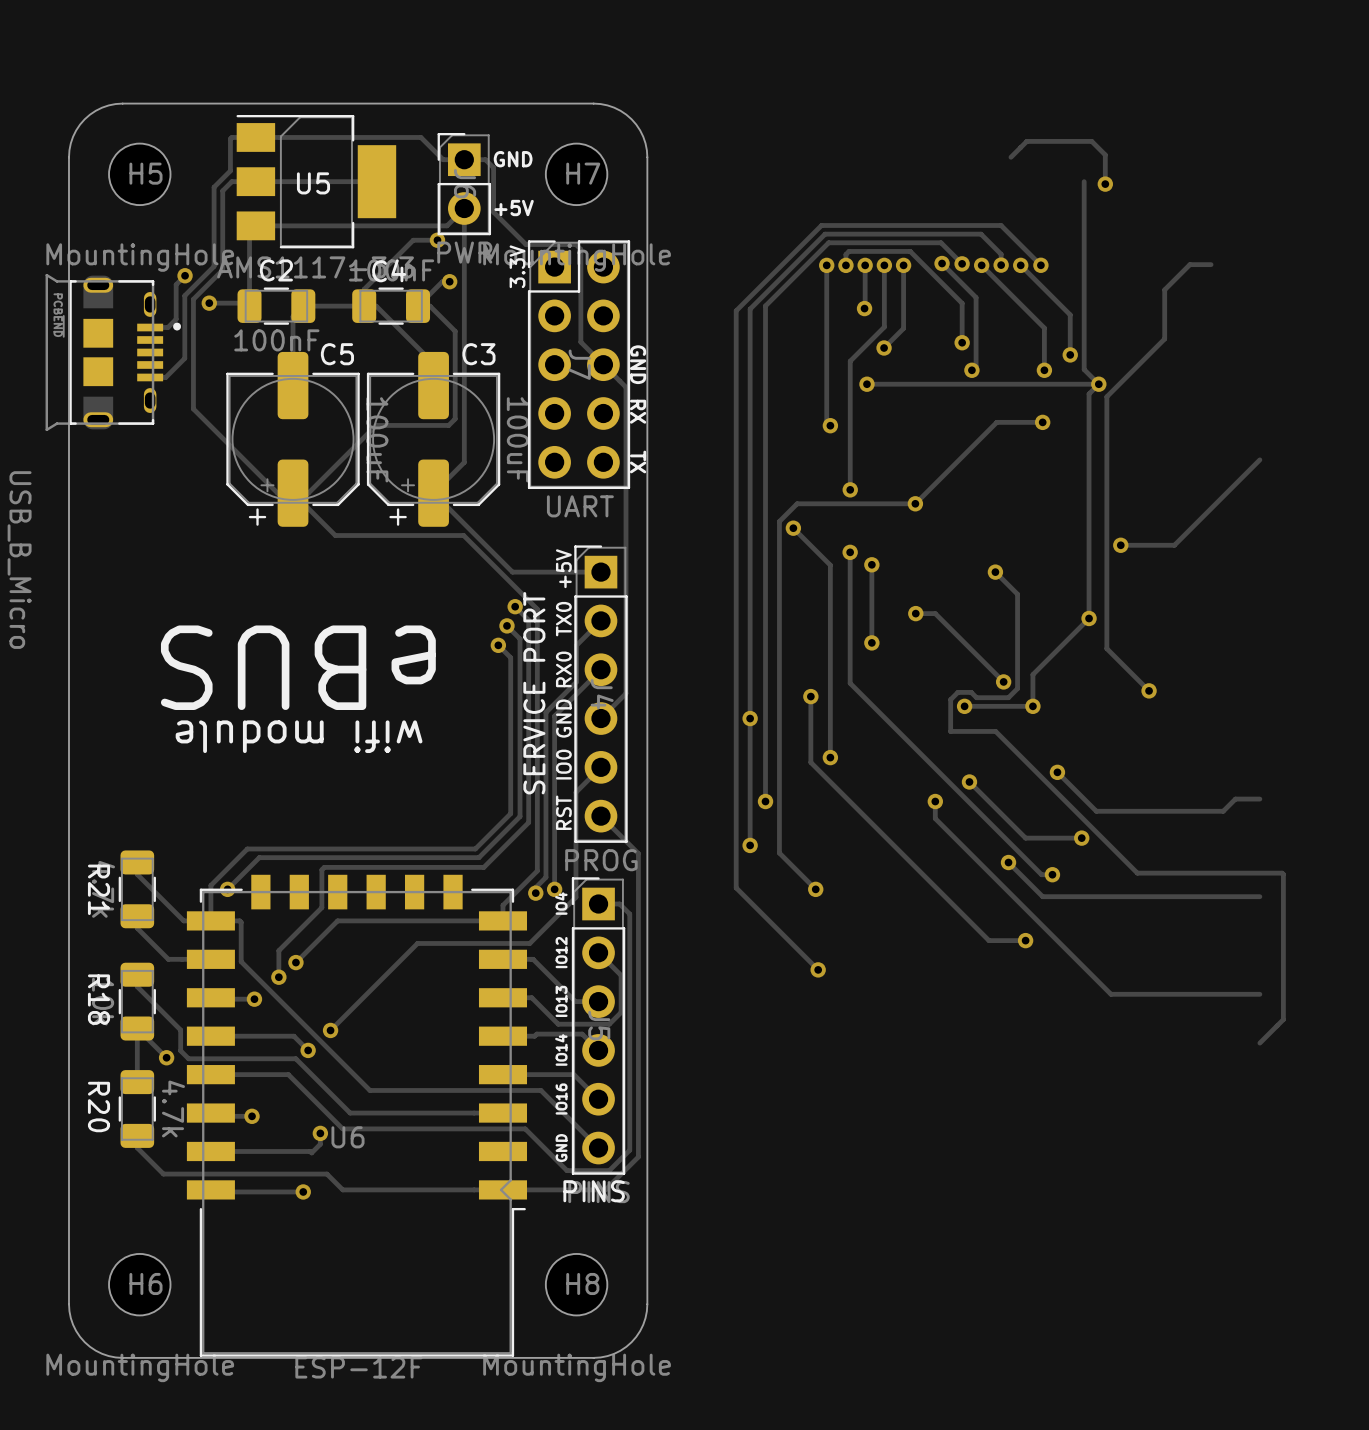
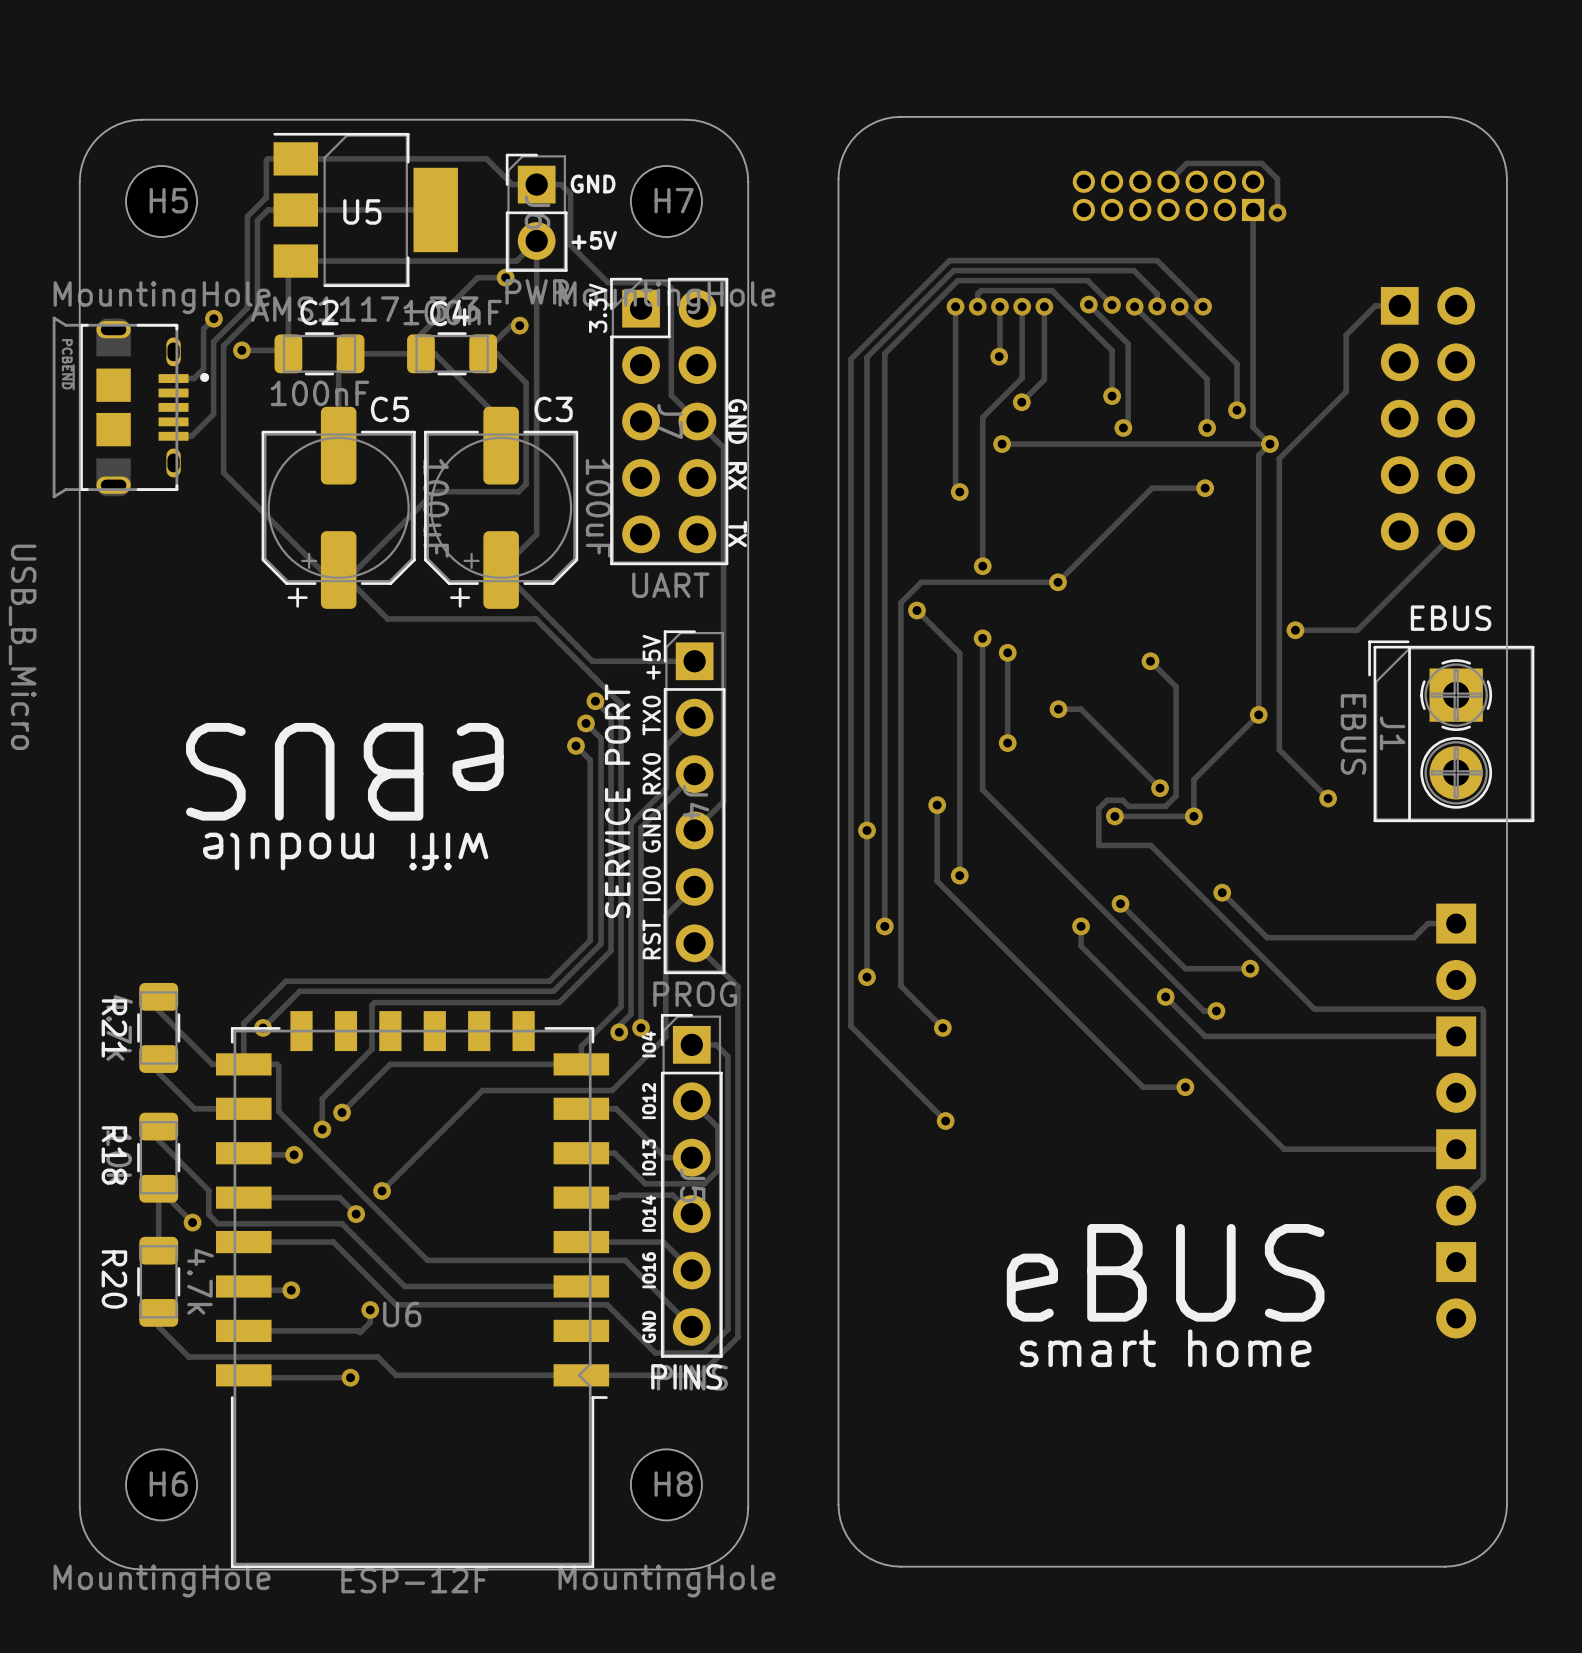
part: none -> (1168, 195)
part: none -> (1427, 418)
text: none -> EBUS (1451, 618)
J1: none -> EBUS (1451, 731)
part: none -> (1456, 951)
part: none -> (1456, 1064)
part: none -> (1456, 1177)
text: none -> eBUS (1165, 1272)
part: none -> (1456, 1290)
text: none -> smart home (1165, 1348)
board edge: none -> (838, 1504) (838, 178) (843, 155) (851, 141) (862, 129) (876, 121) (900, 116) (1444, 116) (1468, 121) (1482, 129) (1498, 147) (1504, 162) (1506, 178) (1506, 1504) (1502, 1528) (1494, 1542) (1482, 1553) (1468, 1561) (1444, 1566) (900, 1566) (876, 1561) (856, 1548) (843, 1528) (838, 1504)

